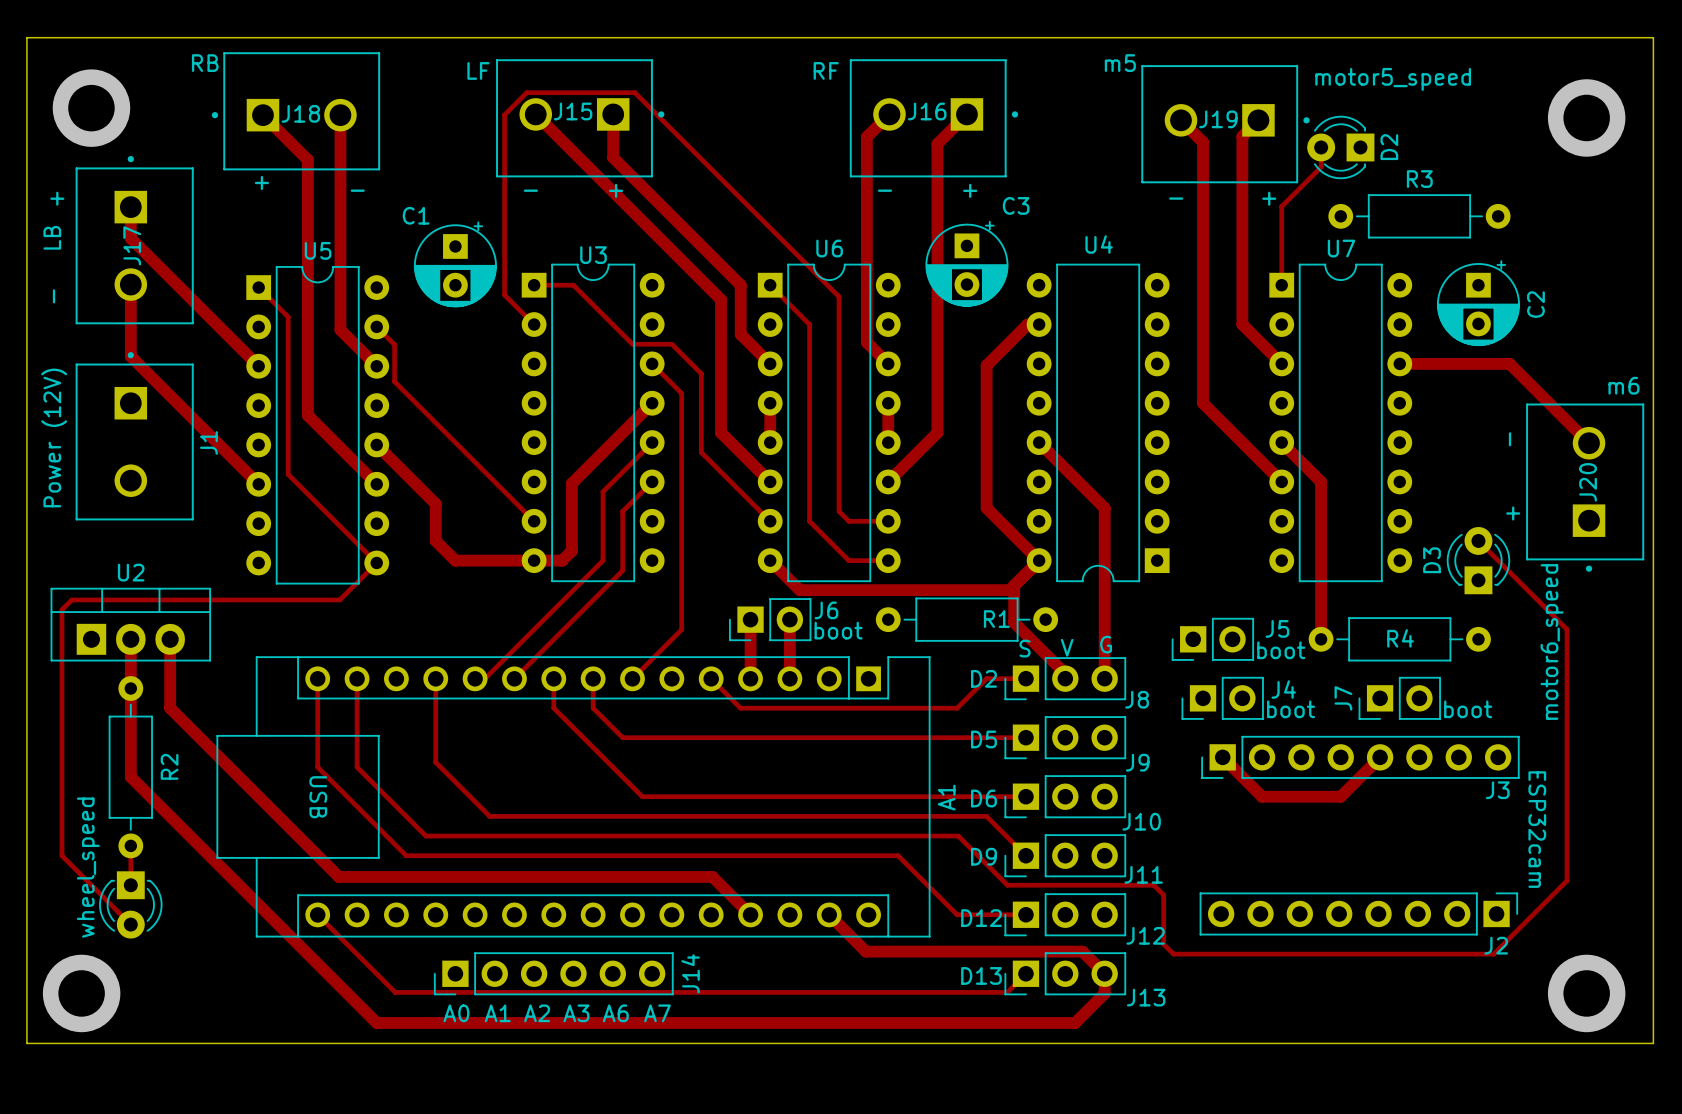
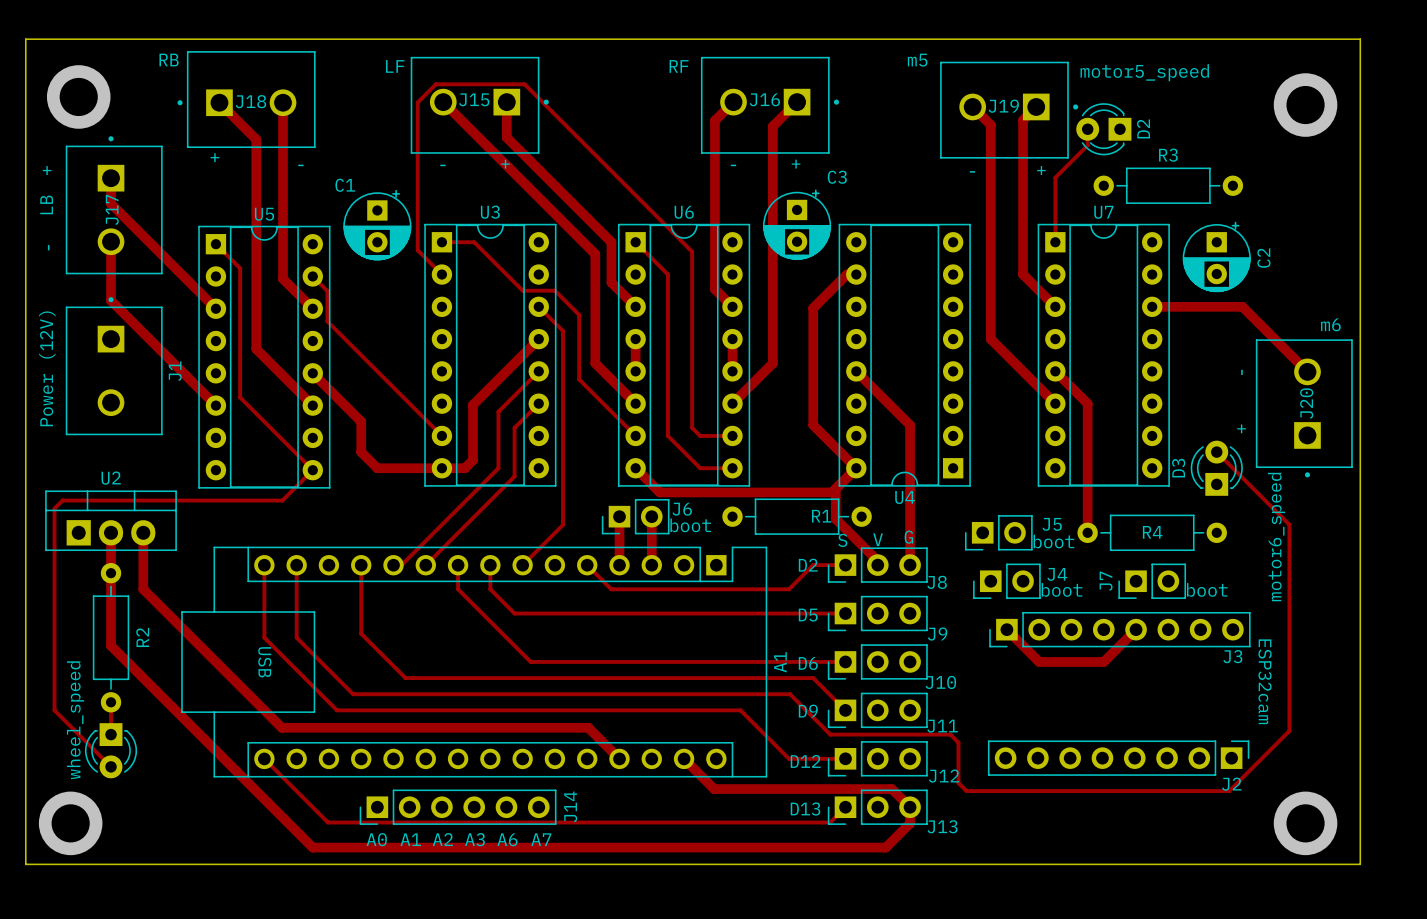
U4 name position: U4 (1099, 244) -> U4 (905, 497)
U3 footprint: [521, 263, 665, 583] -> [424, 223, 557, 487]
U6 footprint: [757, 263, 901, 583] -> [617, 223, 751, 487]
U4 footprint: [1026, 263, 1170, 583] -> [838, 223, 971, 487]
U7 footprint: [1269, 263, 1413, 583] -> [1037, 223, 1170, 487]
U5 footprint: [246, 266, 390, 585] -> [198, 225, 331, 489]

